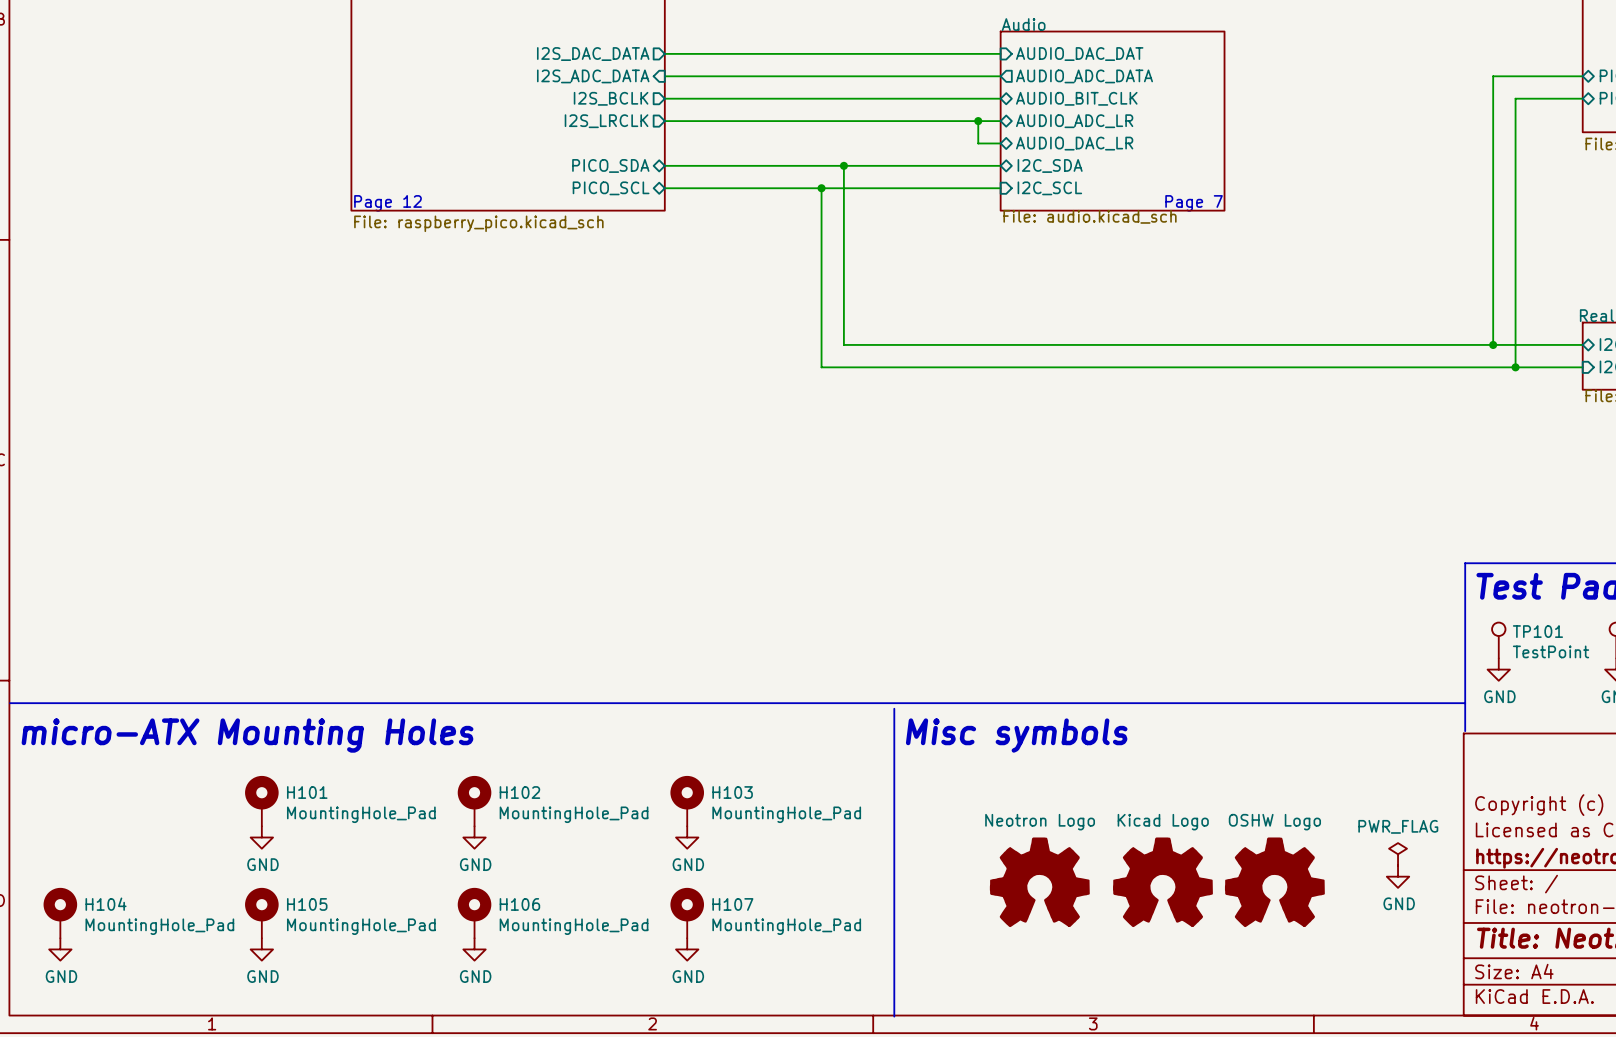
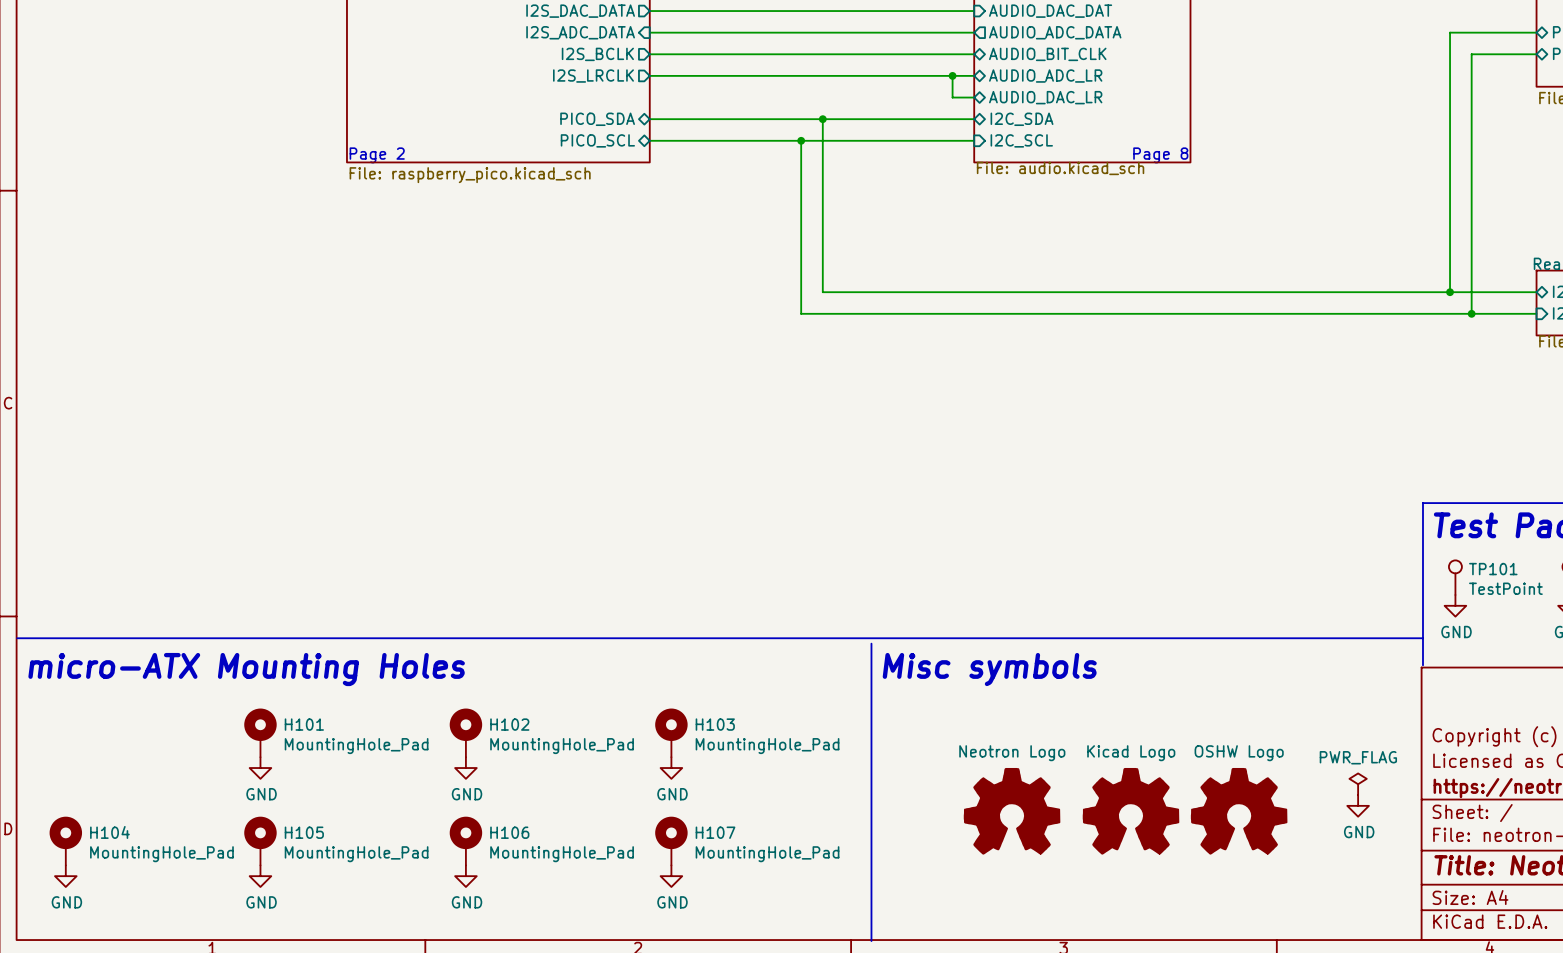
text: Page 12 (387, 203) -> Page 2 (377, 155)
text: Page 7 (1194, 203) -> Page 8 (1160, 155)

